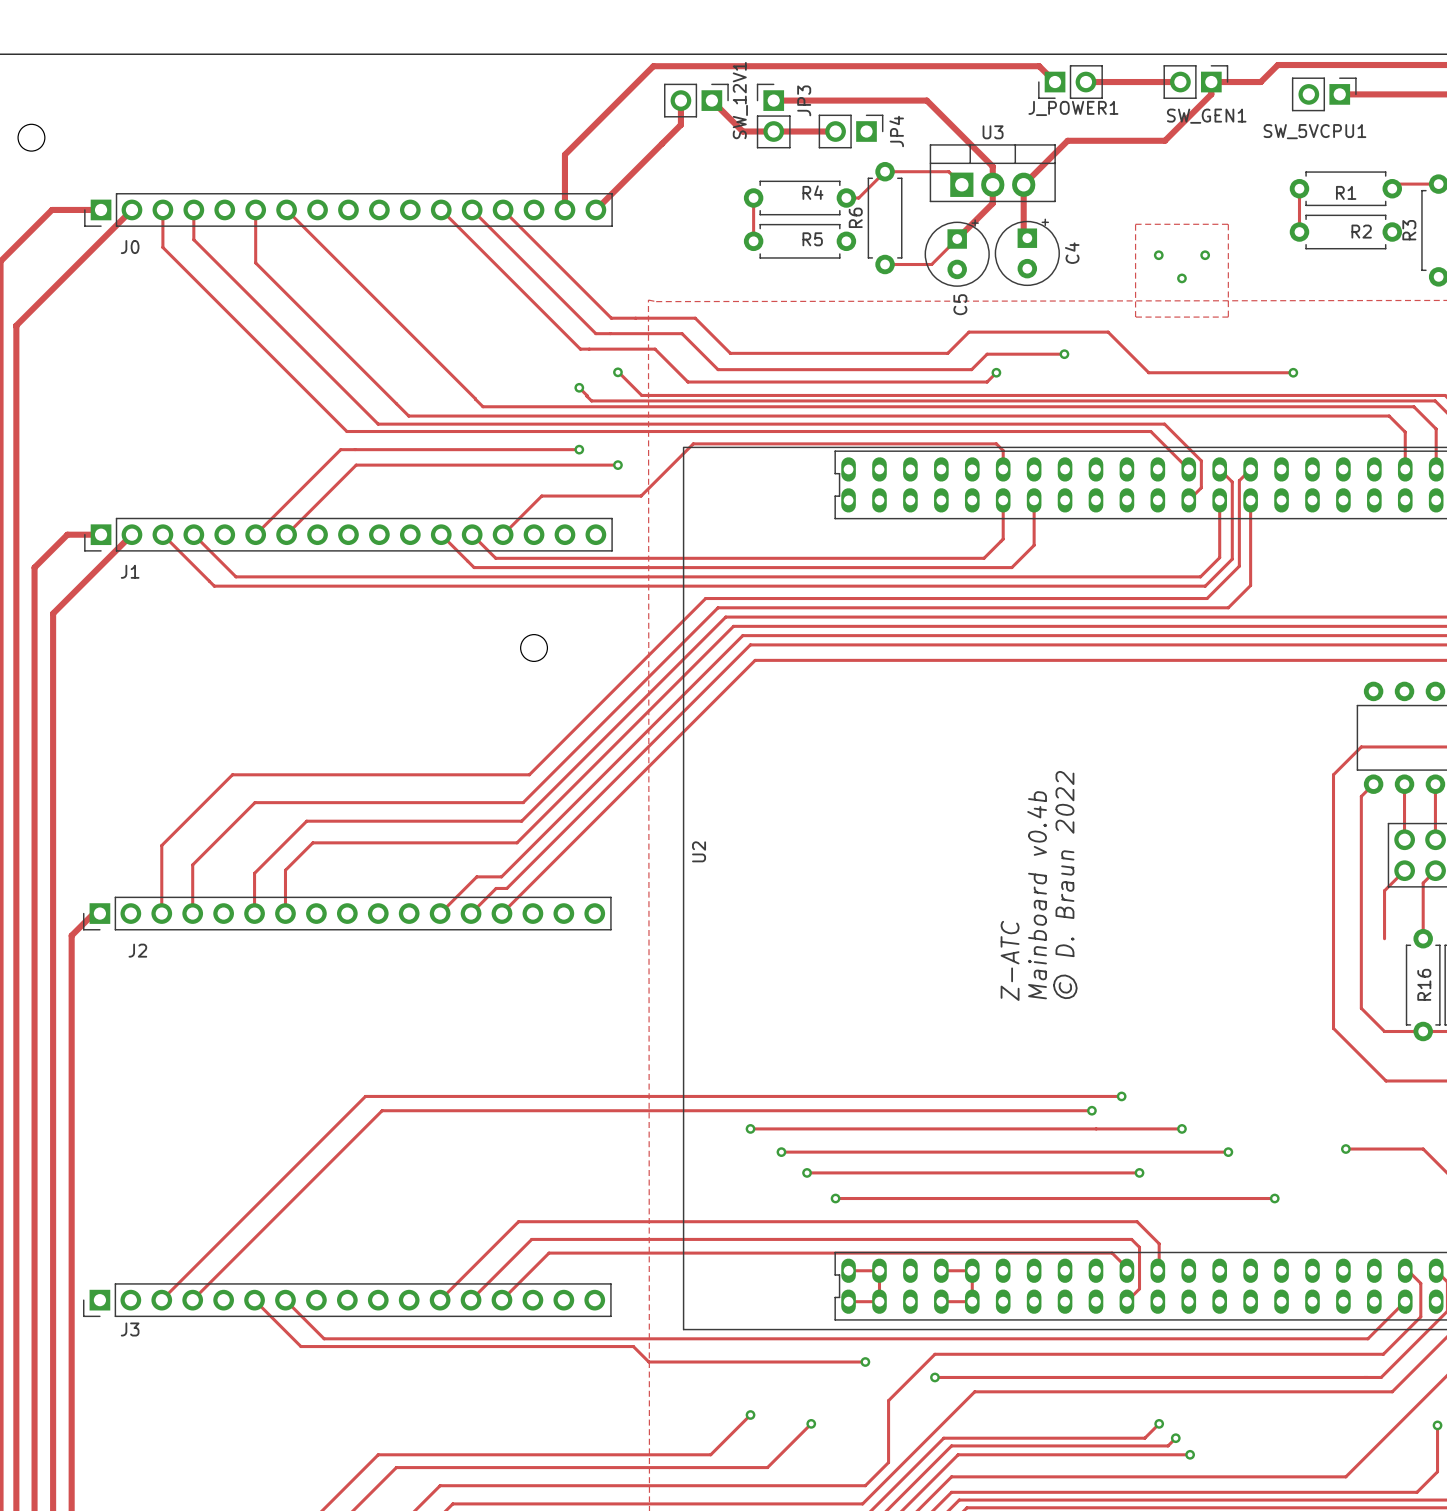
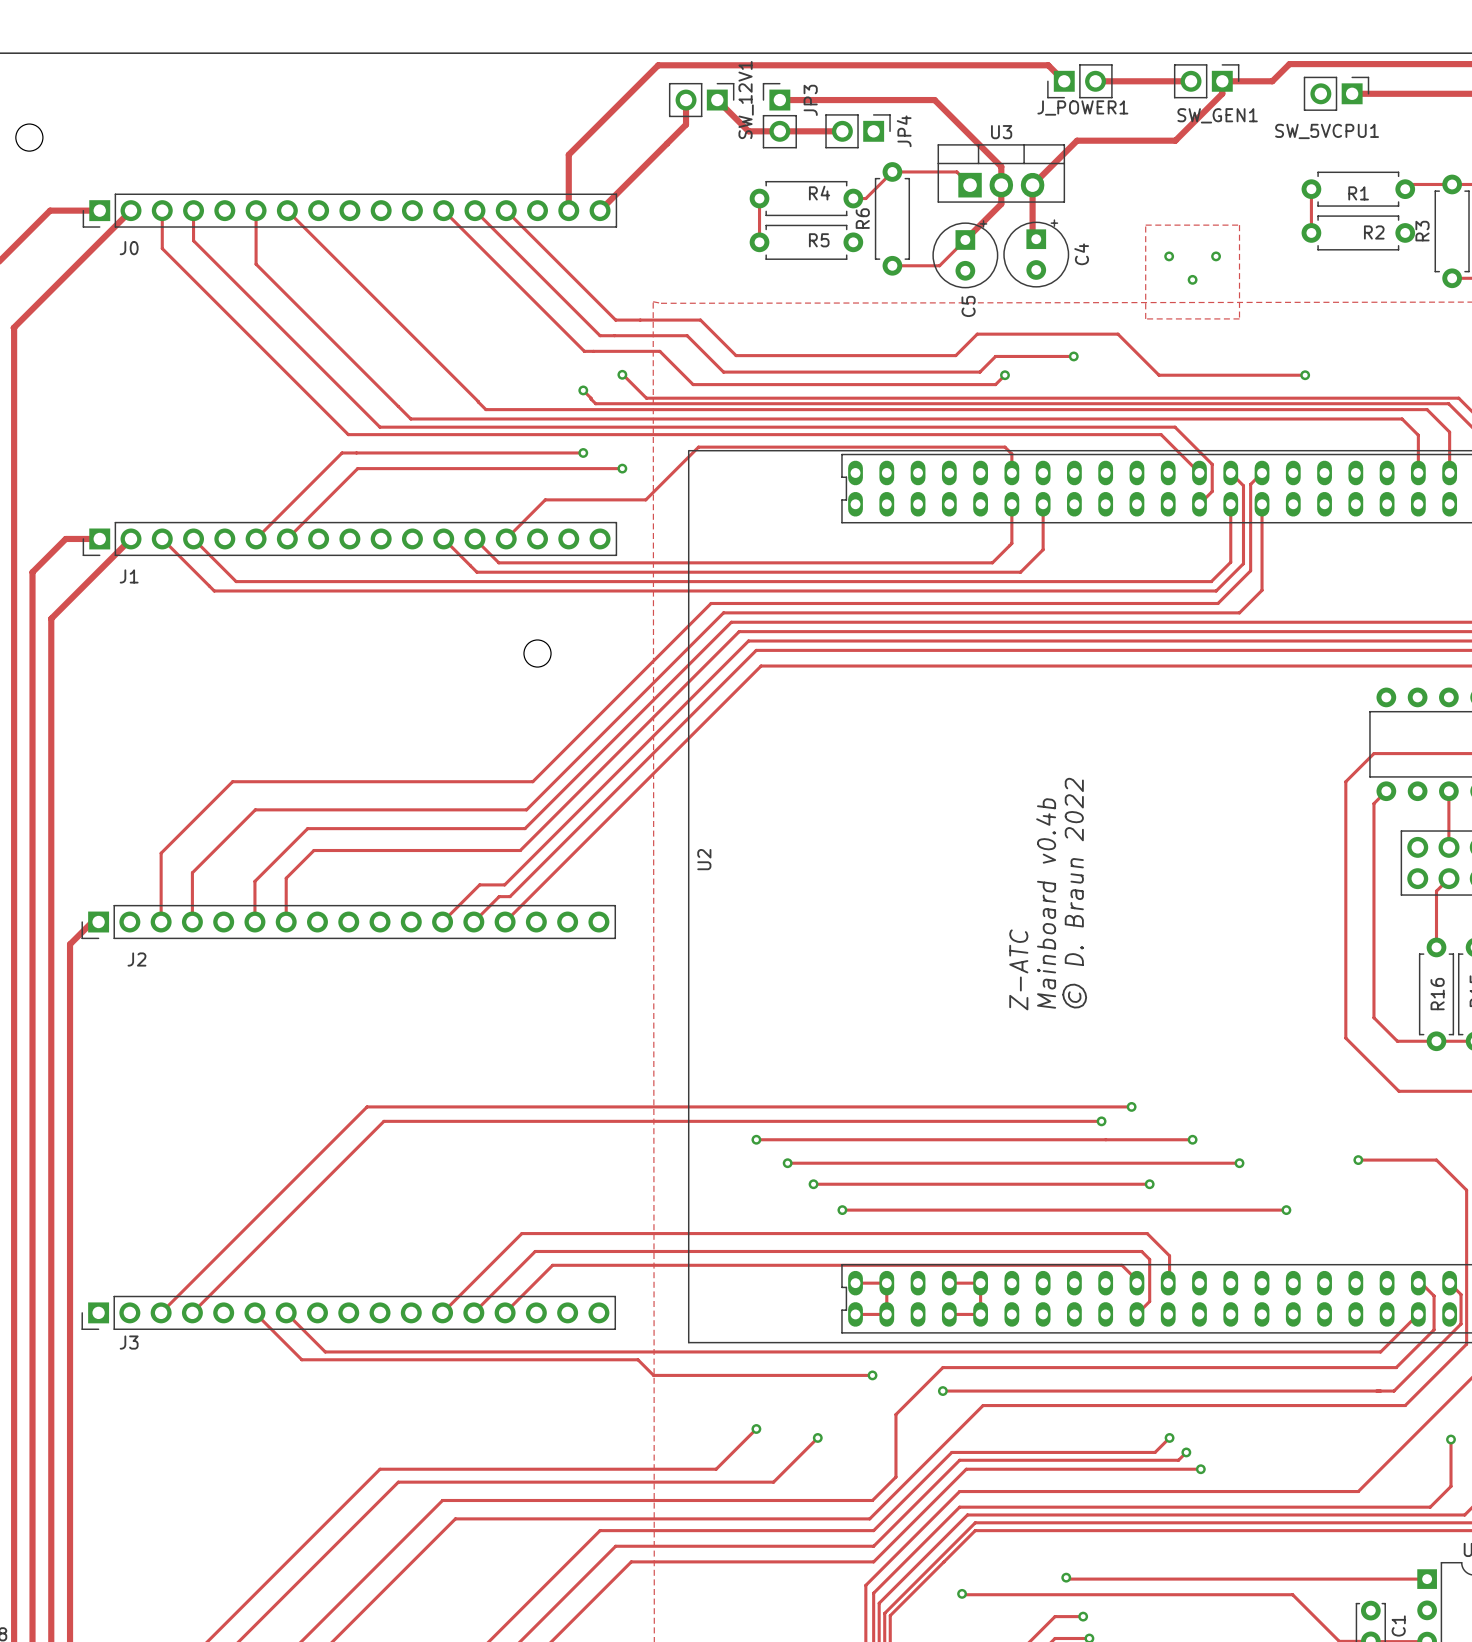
track: (1404, 784) (1404, 839) -> none
track: (1404, 870) (1384, 890) (1384, 938) -> none

